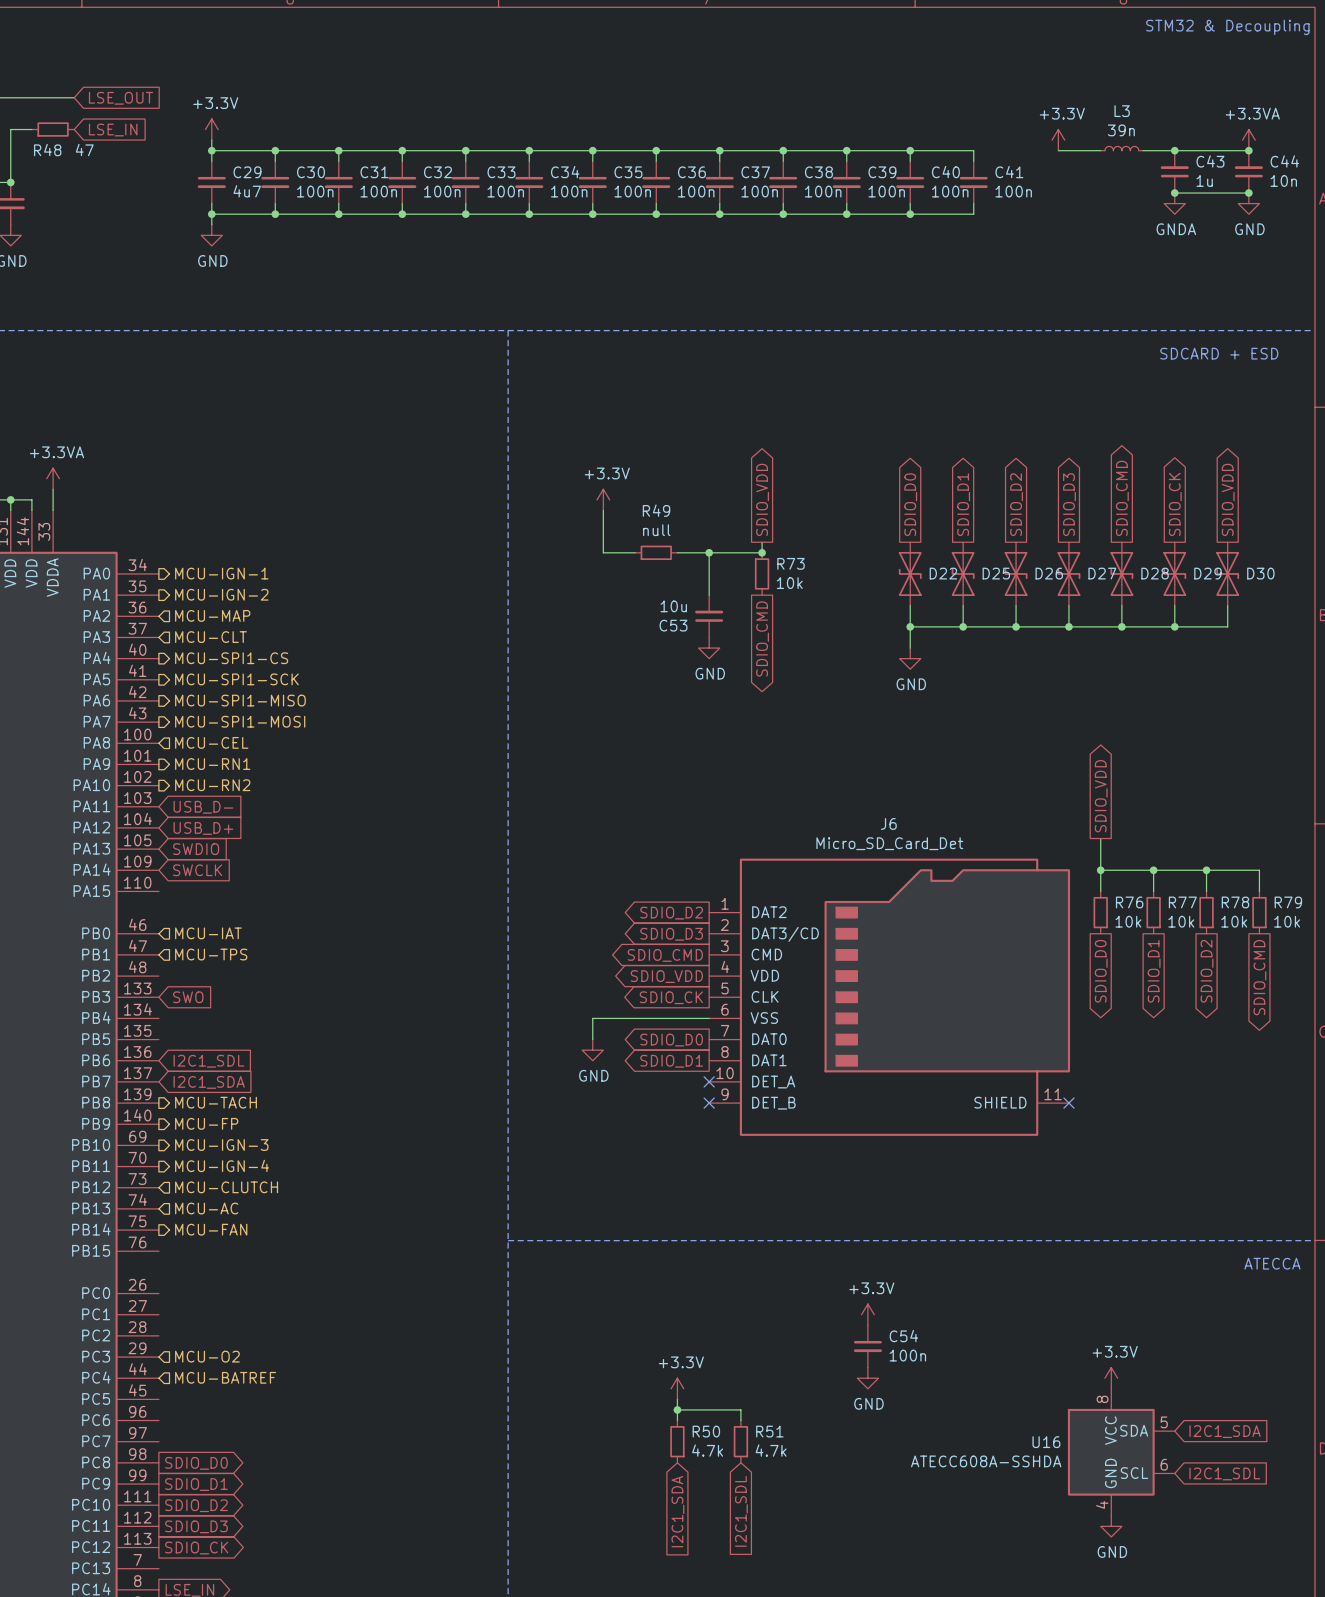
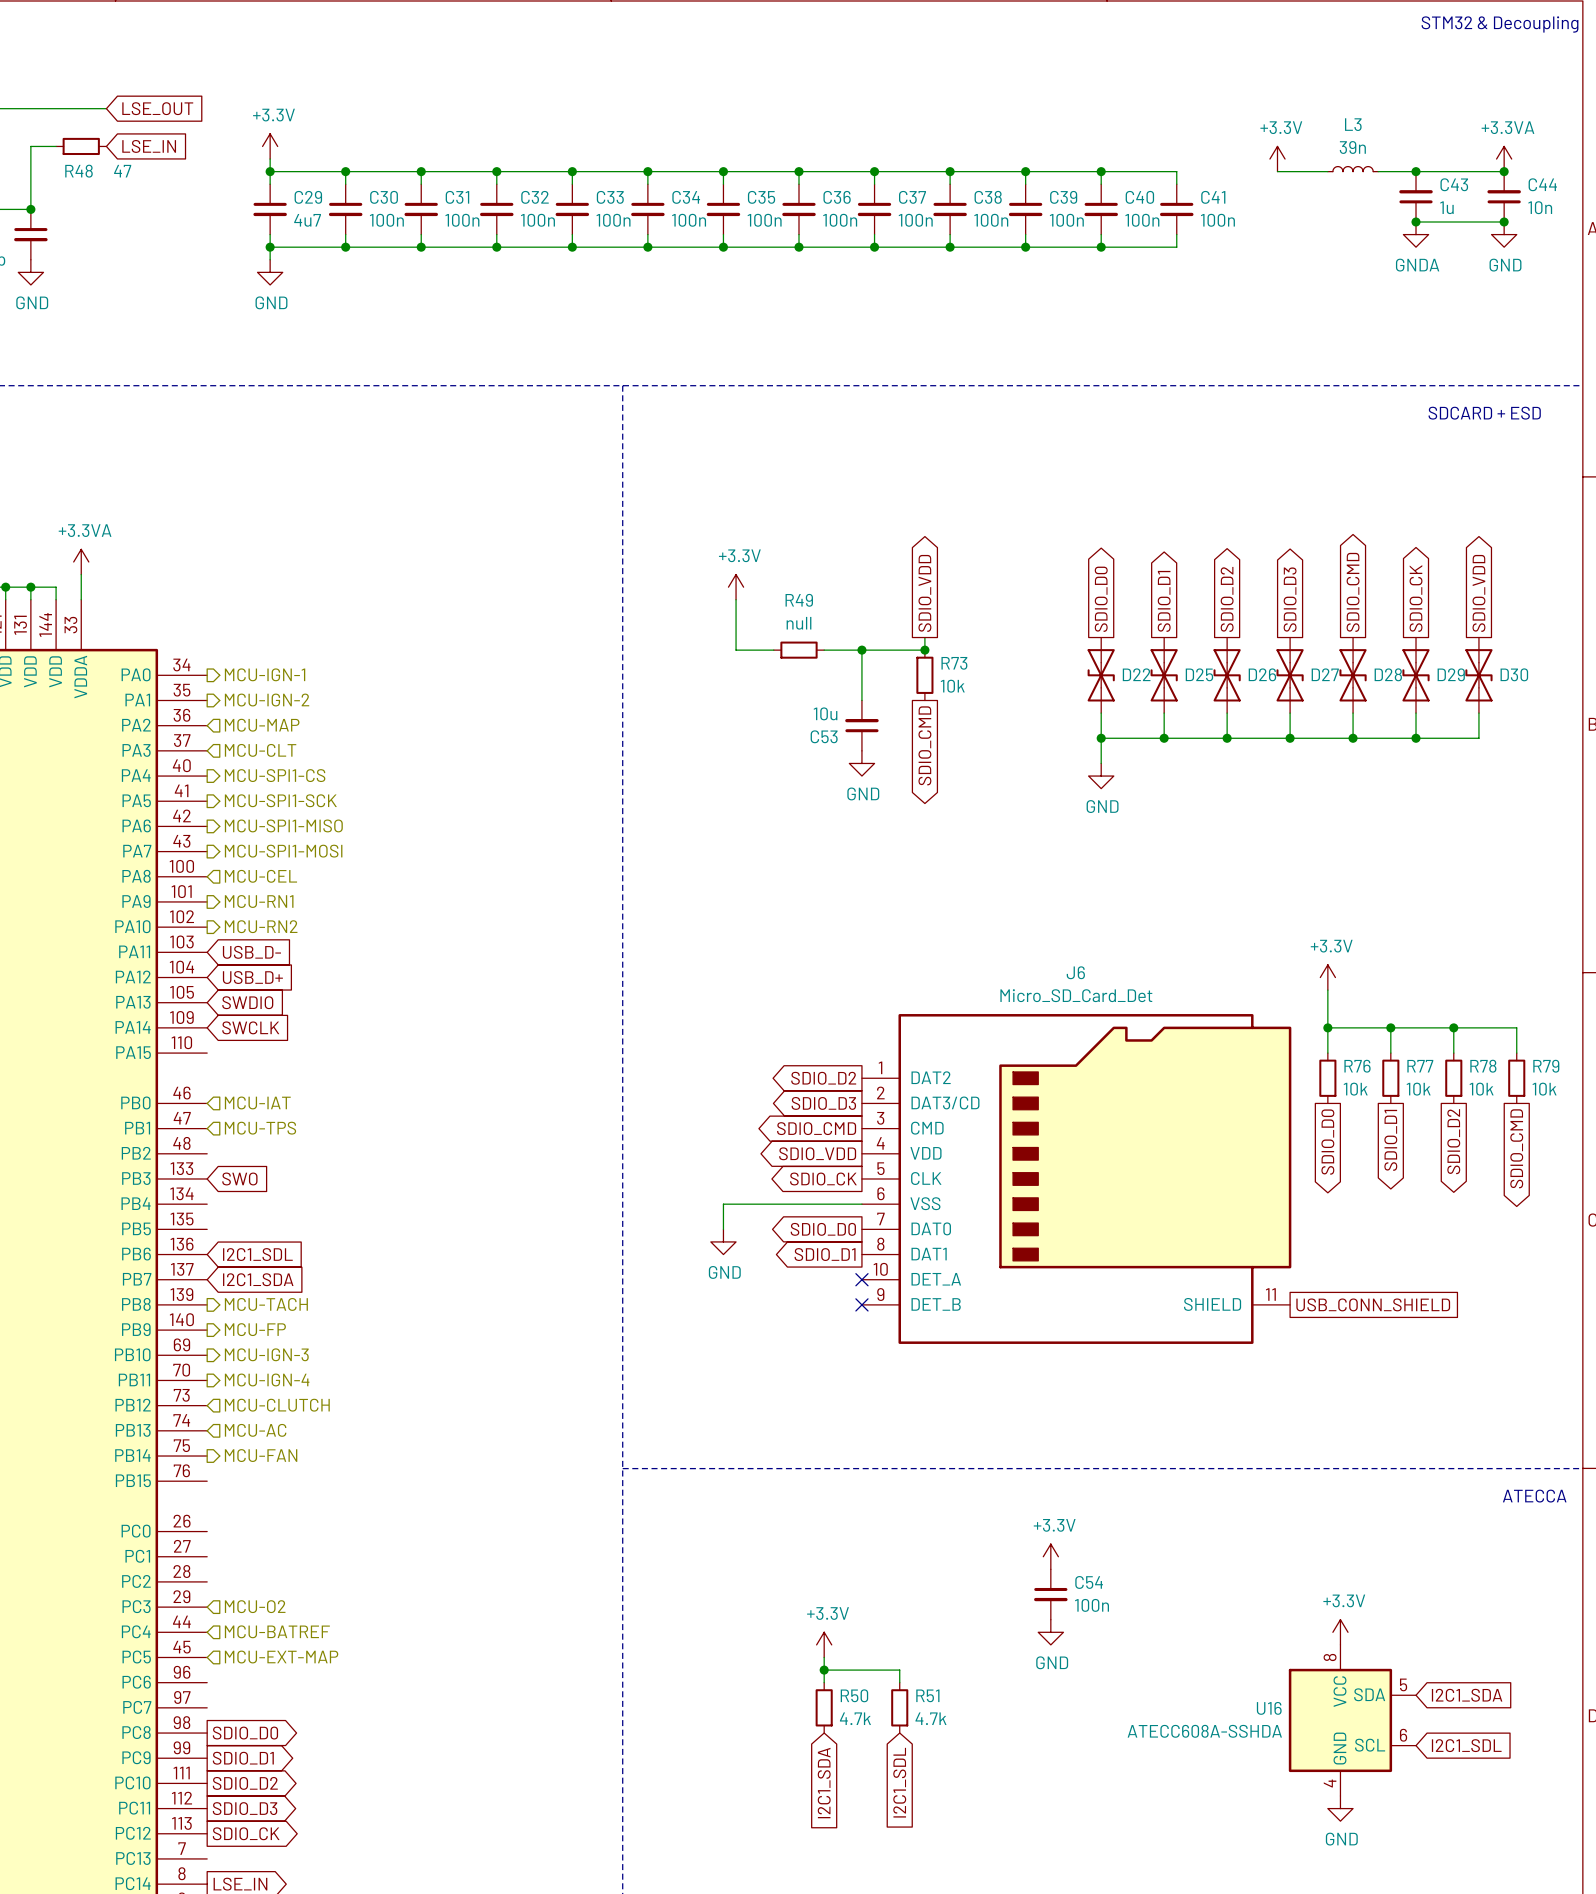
global label: SDIO_VDD (1101, 796) -> none
power symbol: none -> +3.3V (1327, 977)
no-connect mark: (1068, 1103) -> none
global label: none -> USB_CONN_SHIELD (1373, 1304)
hierarchical label: none -> MCU-EXT-MAP (281, 1657)

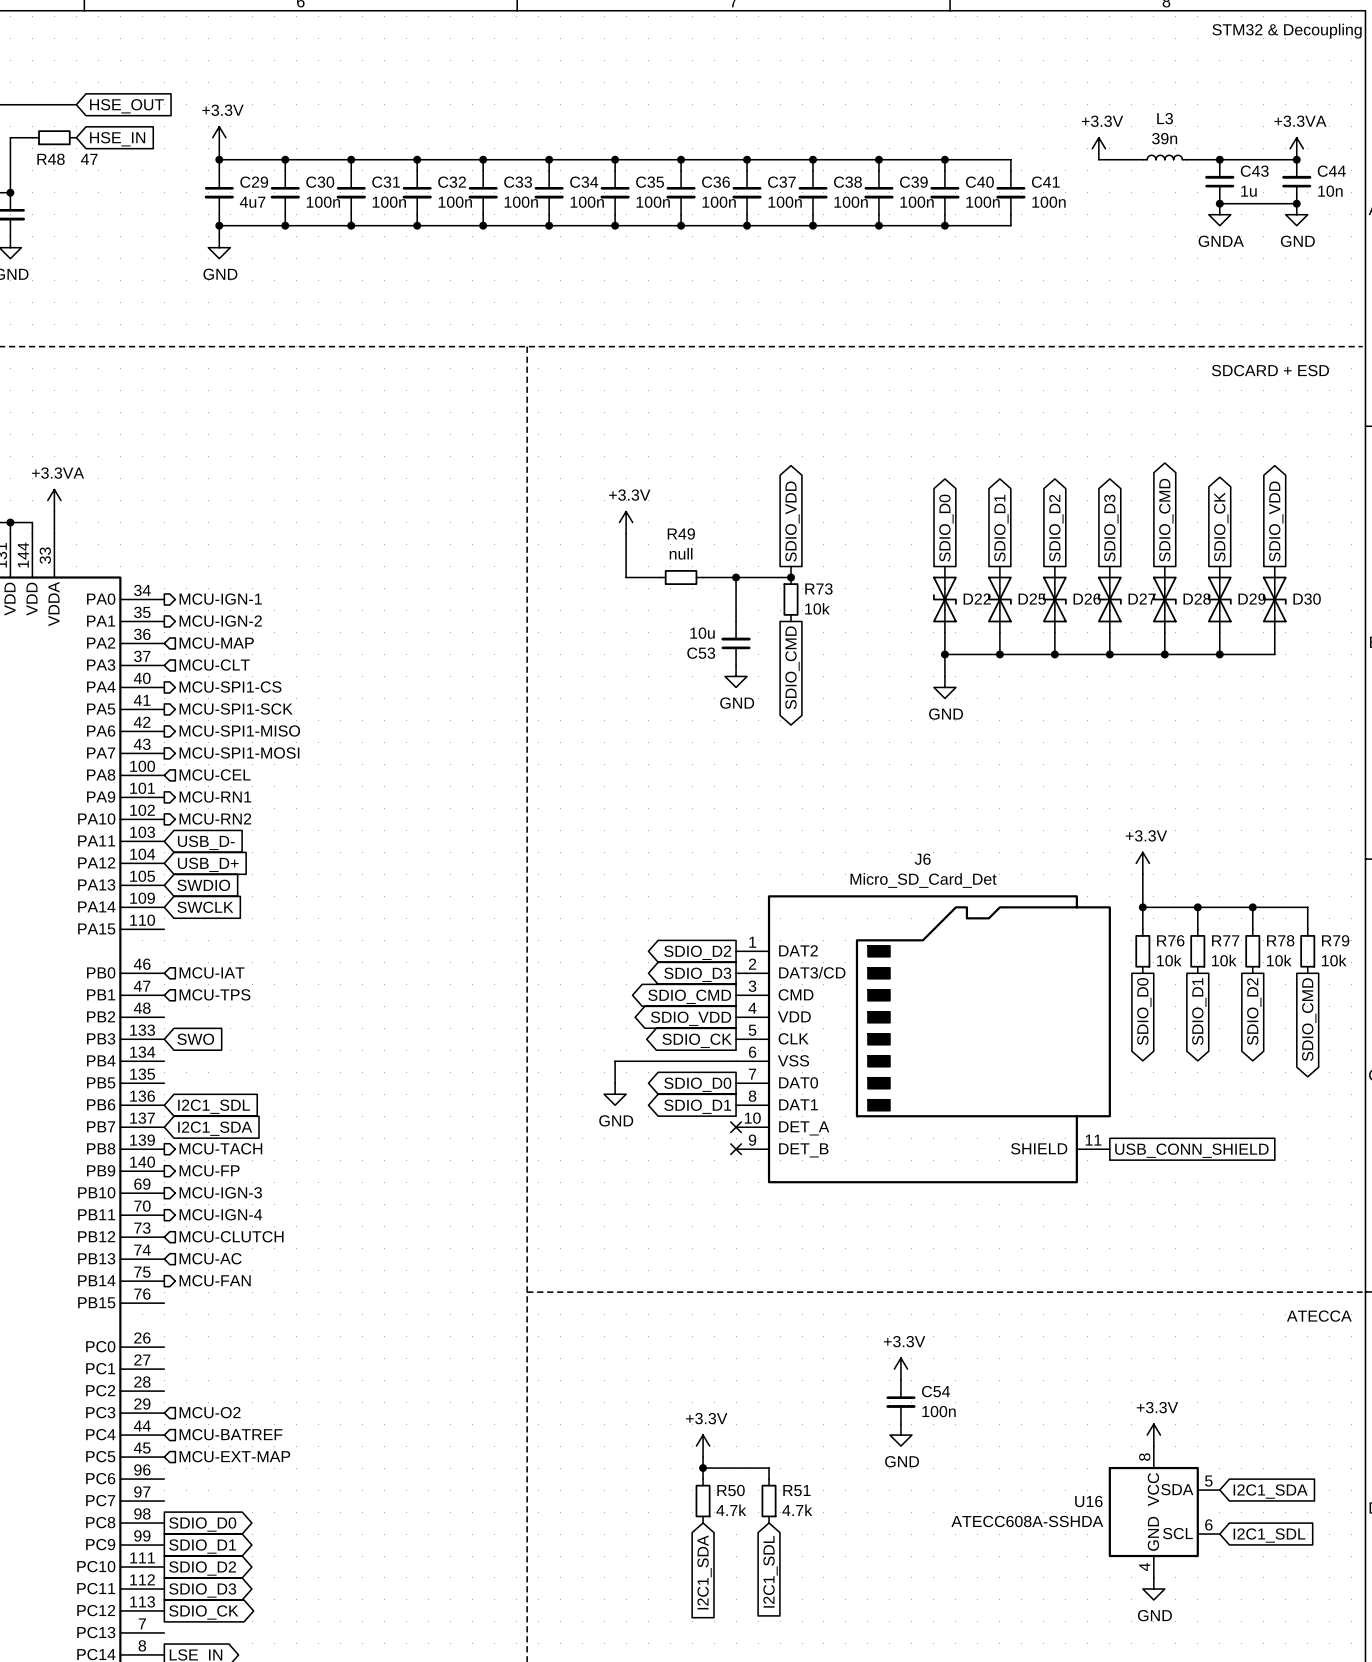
global label: LSE_OUT (157, 108) -> HSE_OUT (126, 106)
global label: LSE_IN (149, 146) -> HSE_IN (117, 139)

